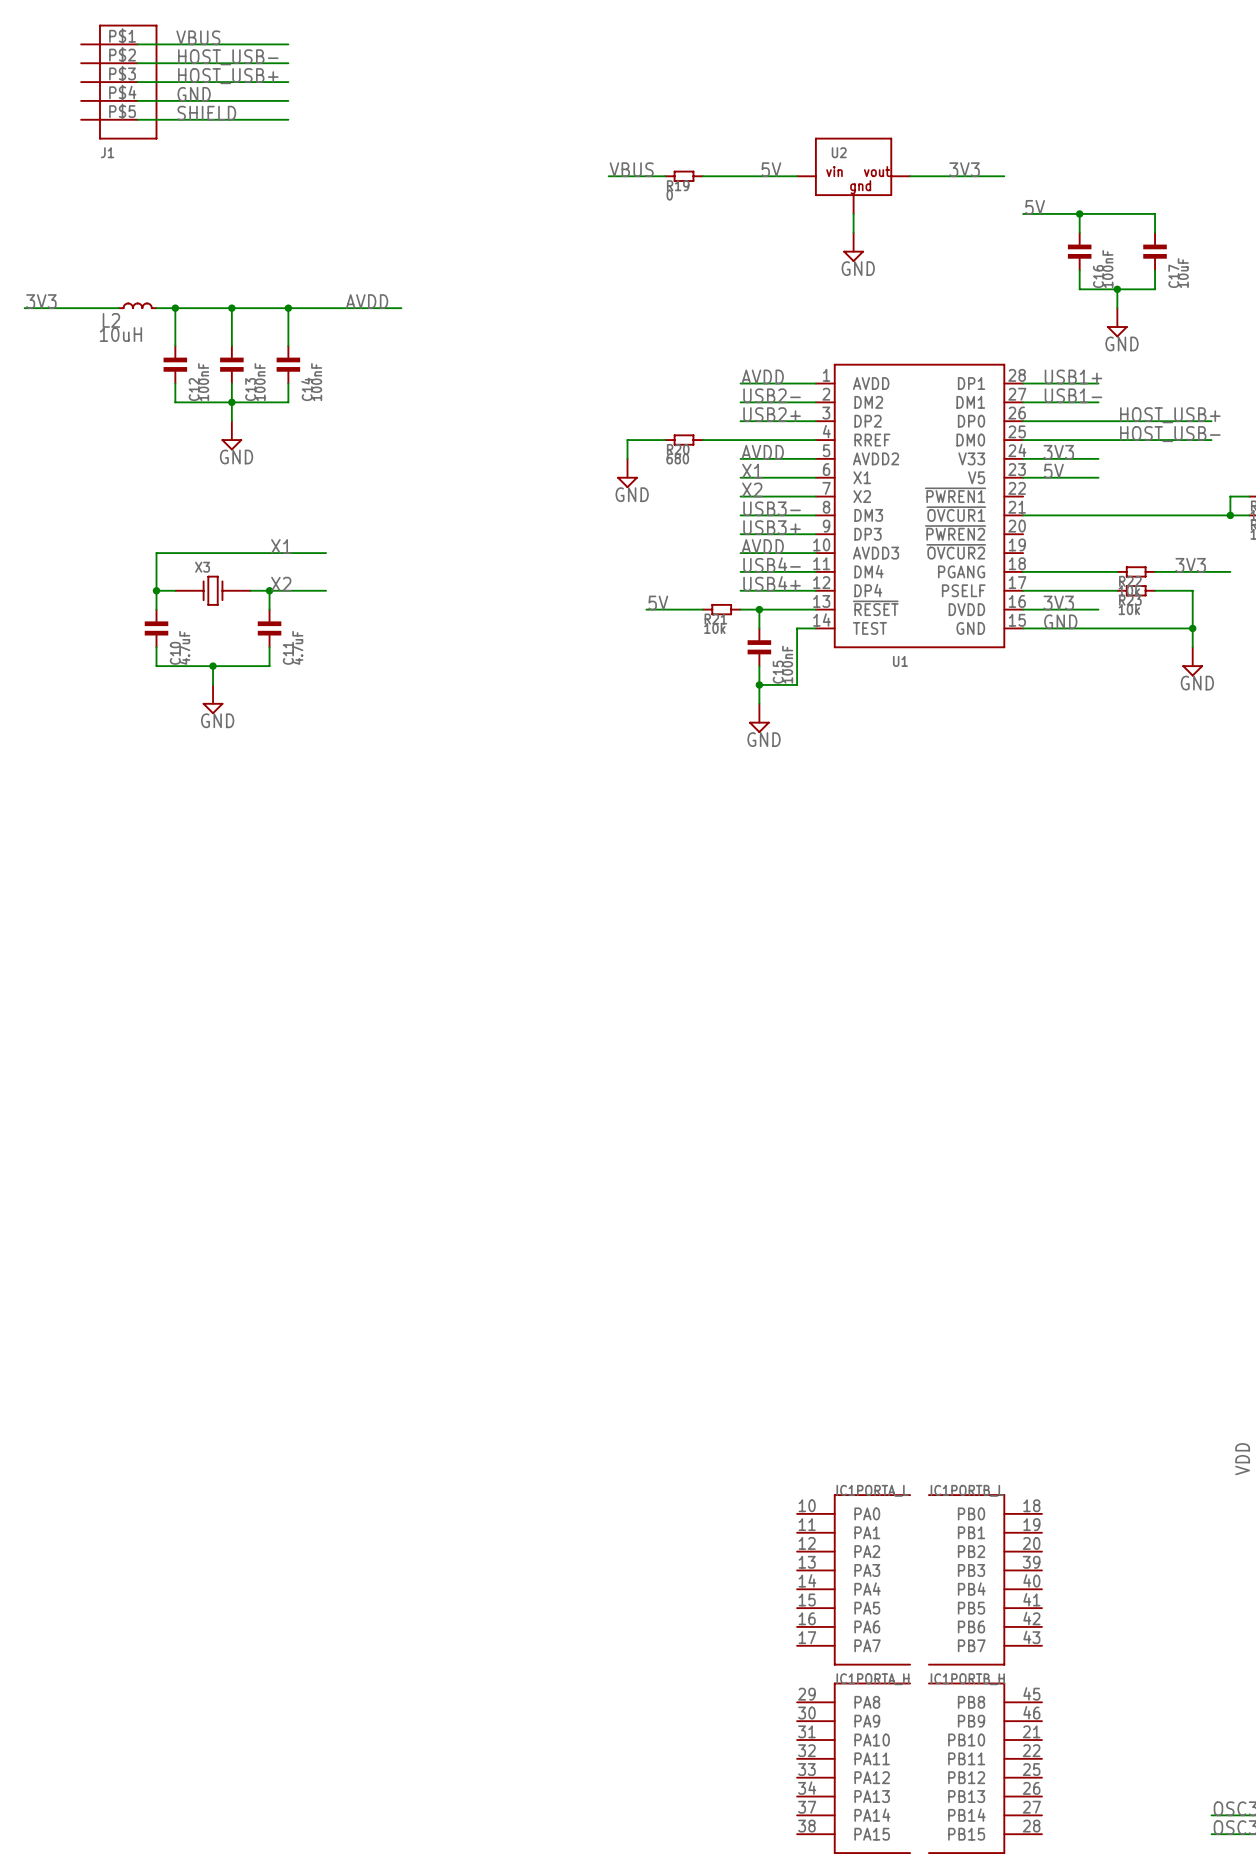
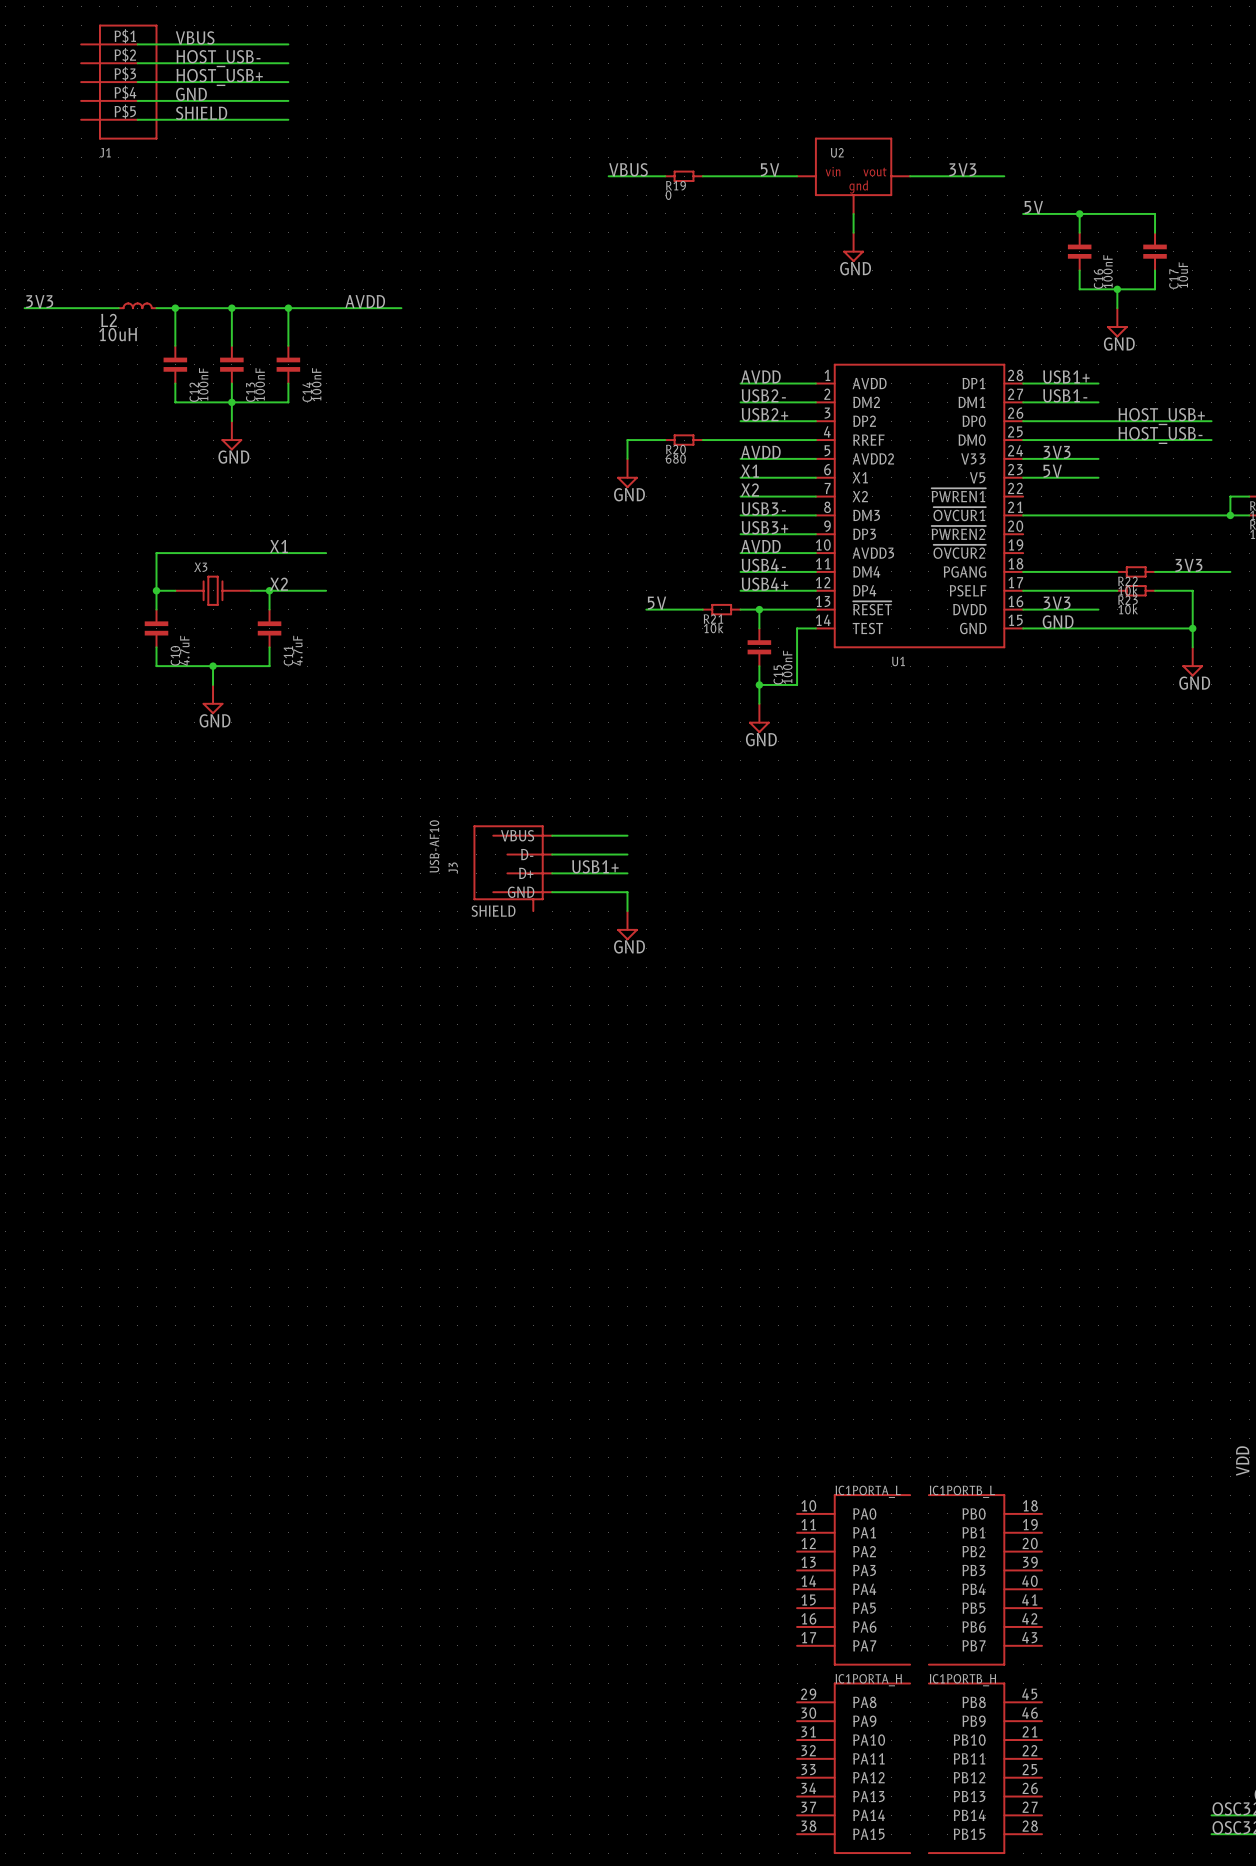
wire: none -> (552, 835) (627, 835)
wire: none -> (552, 854) (627, 854)
label: none -> USB1+ (595, 866)
J3: none -> USB-AF10 (513, 868)
wire: none -> (552, 873) (627, 873)
wire: none -> (552, 892) (627, 892) (627, 911)
power symbol: none -> GND (627, 925)

